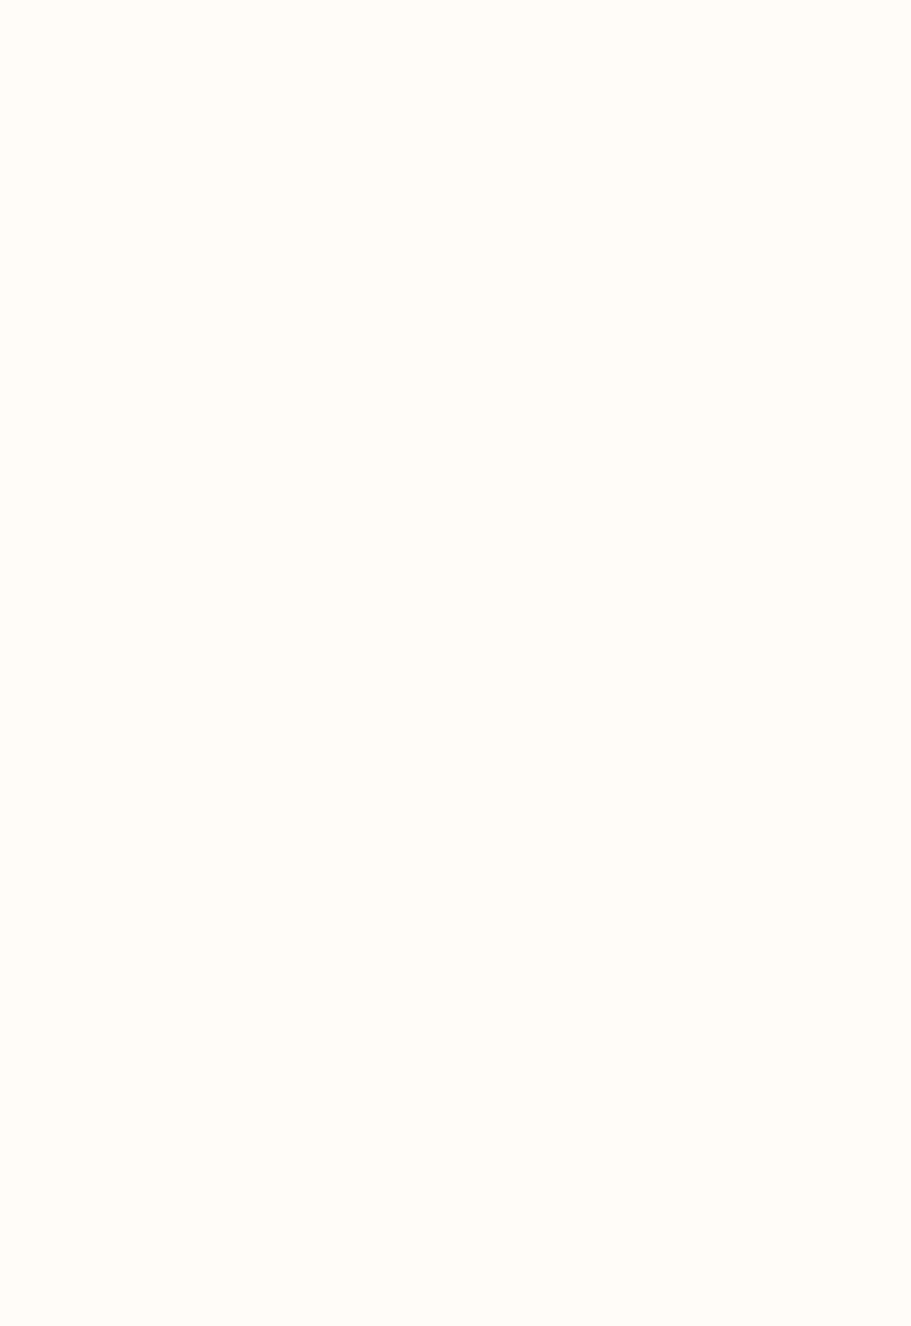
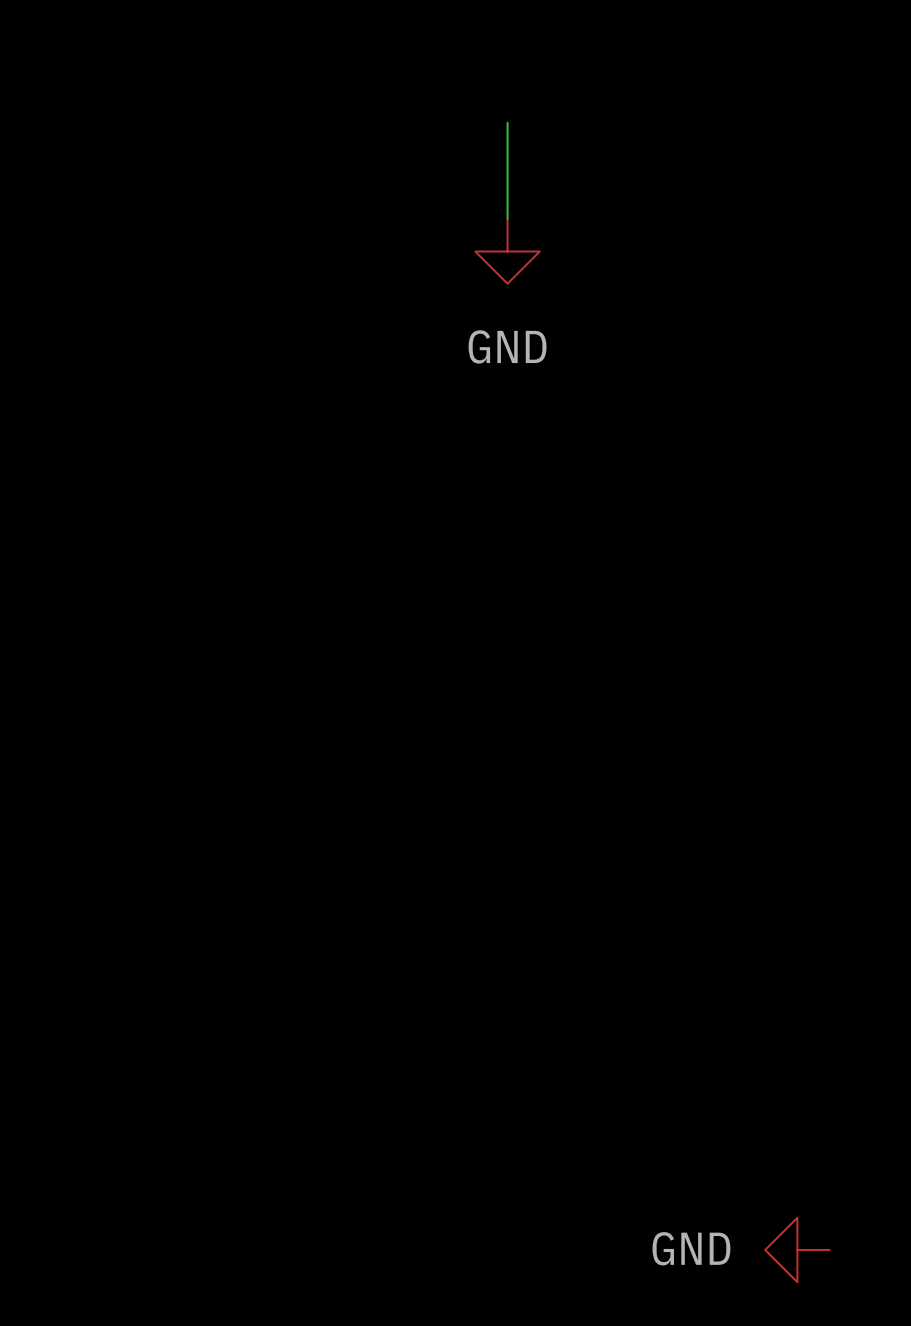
wire: none -> (507, 122) (507, 219)
power symbol: none -> GND (507, 251)
power symbol: none -> GND (797, 1249)

